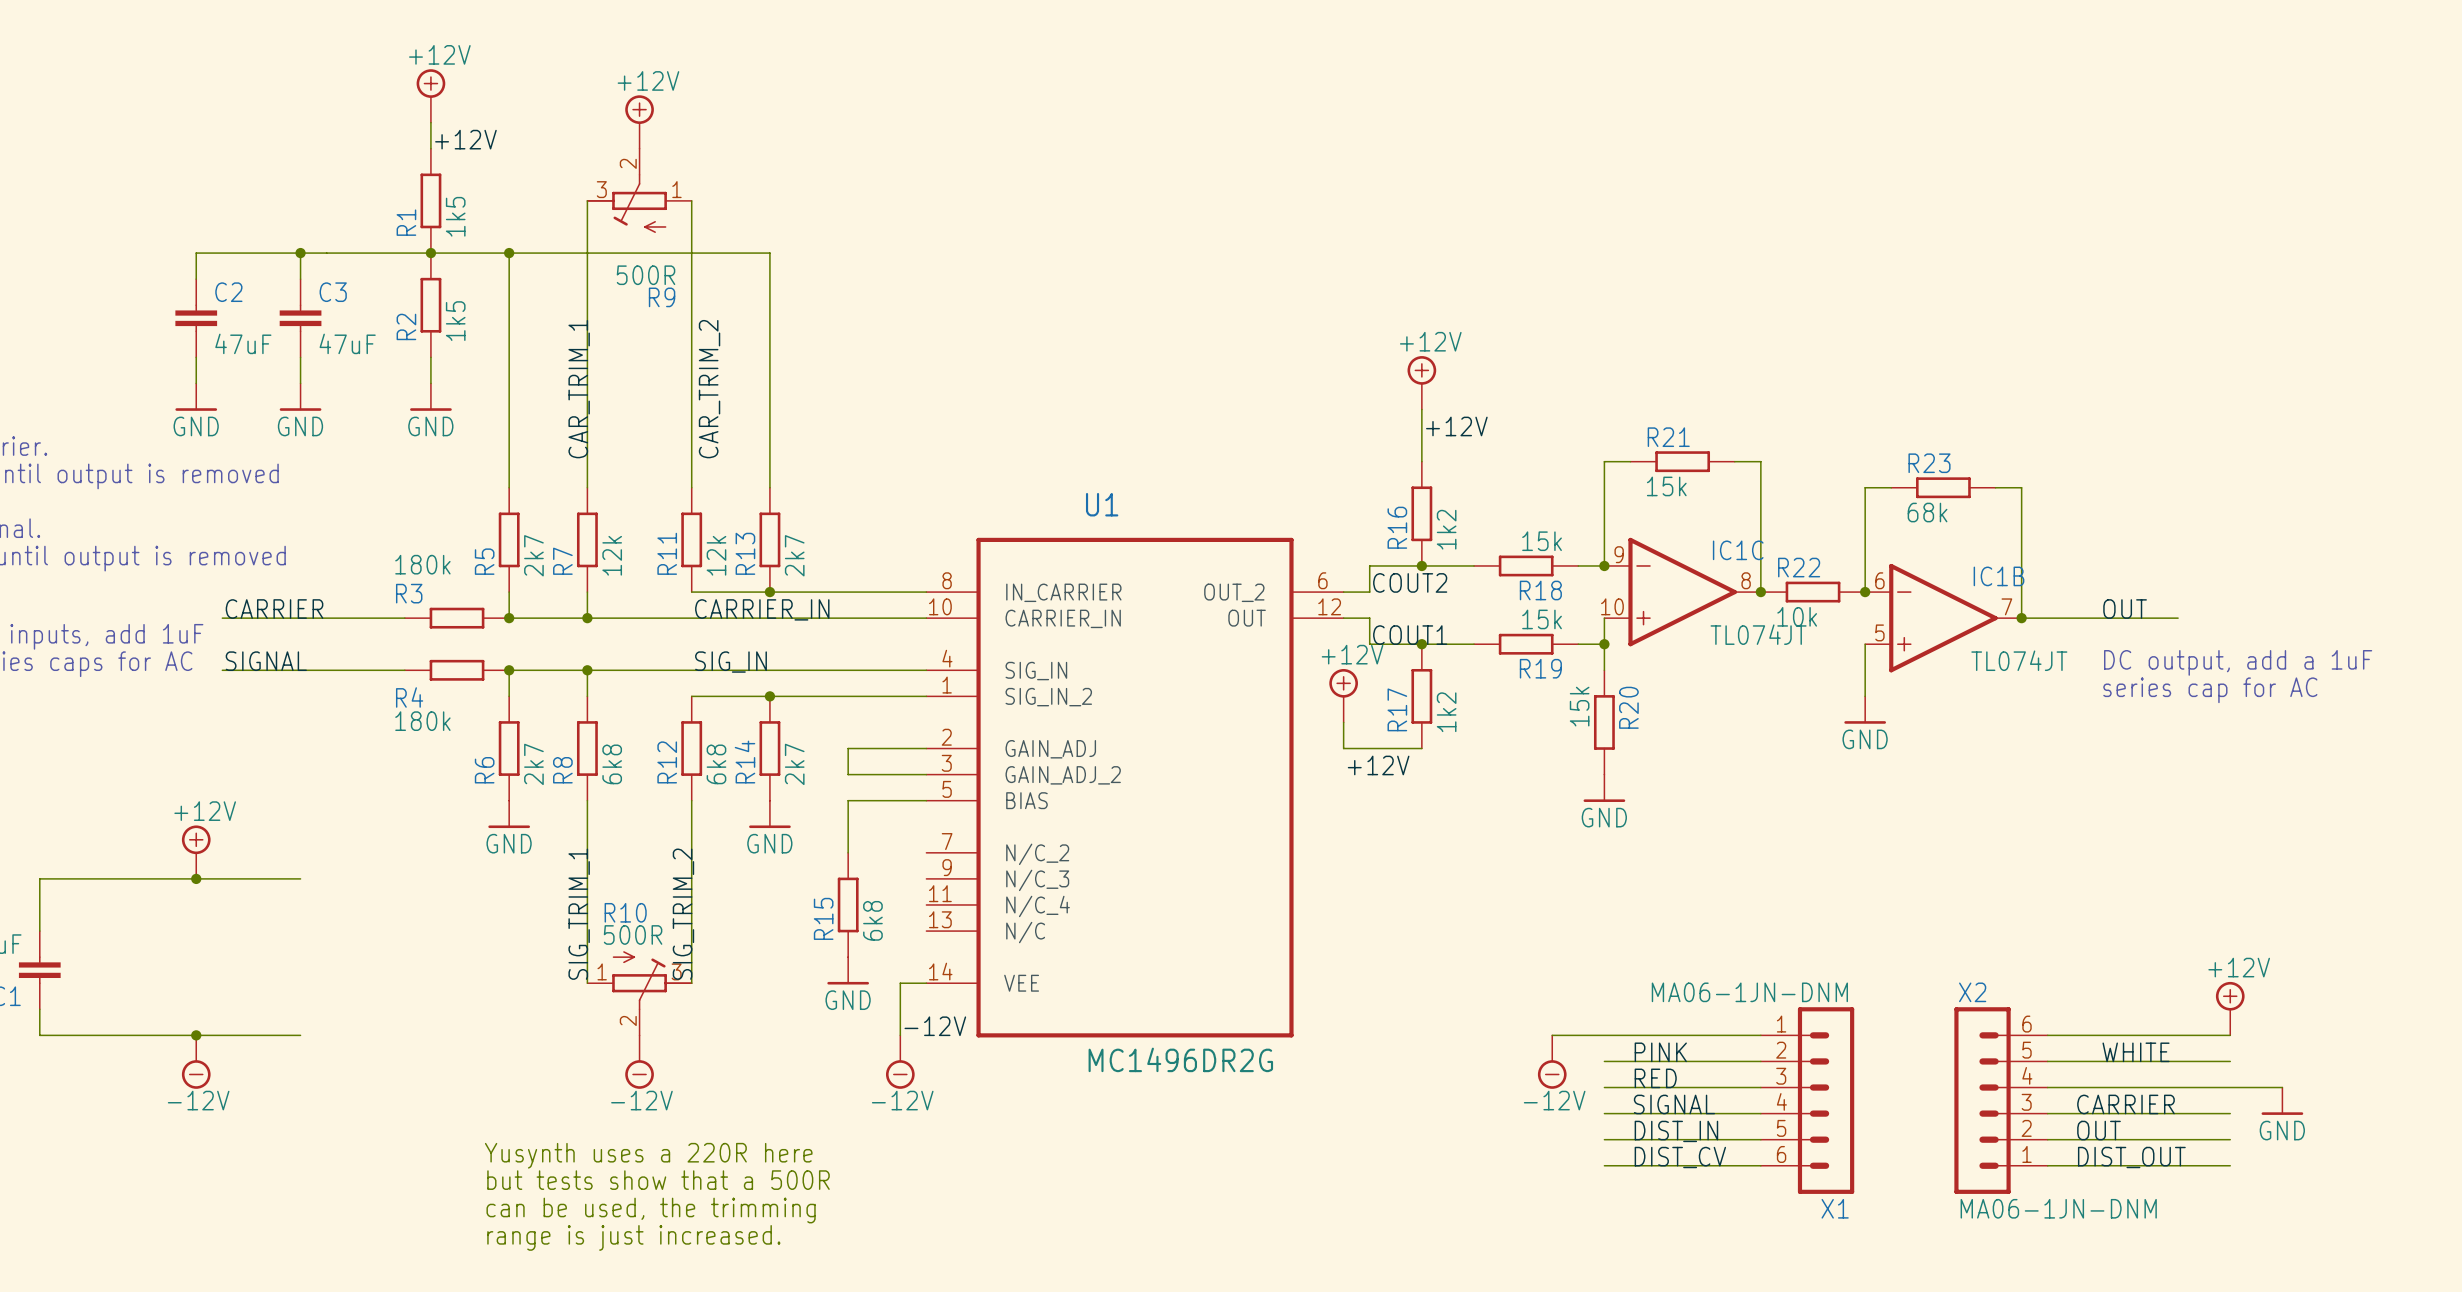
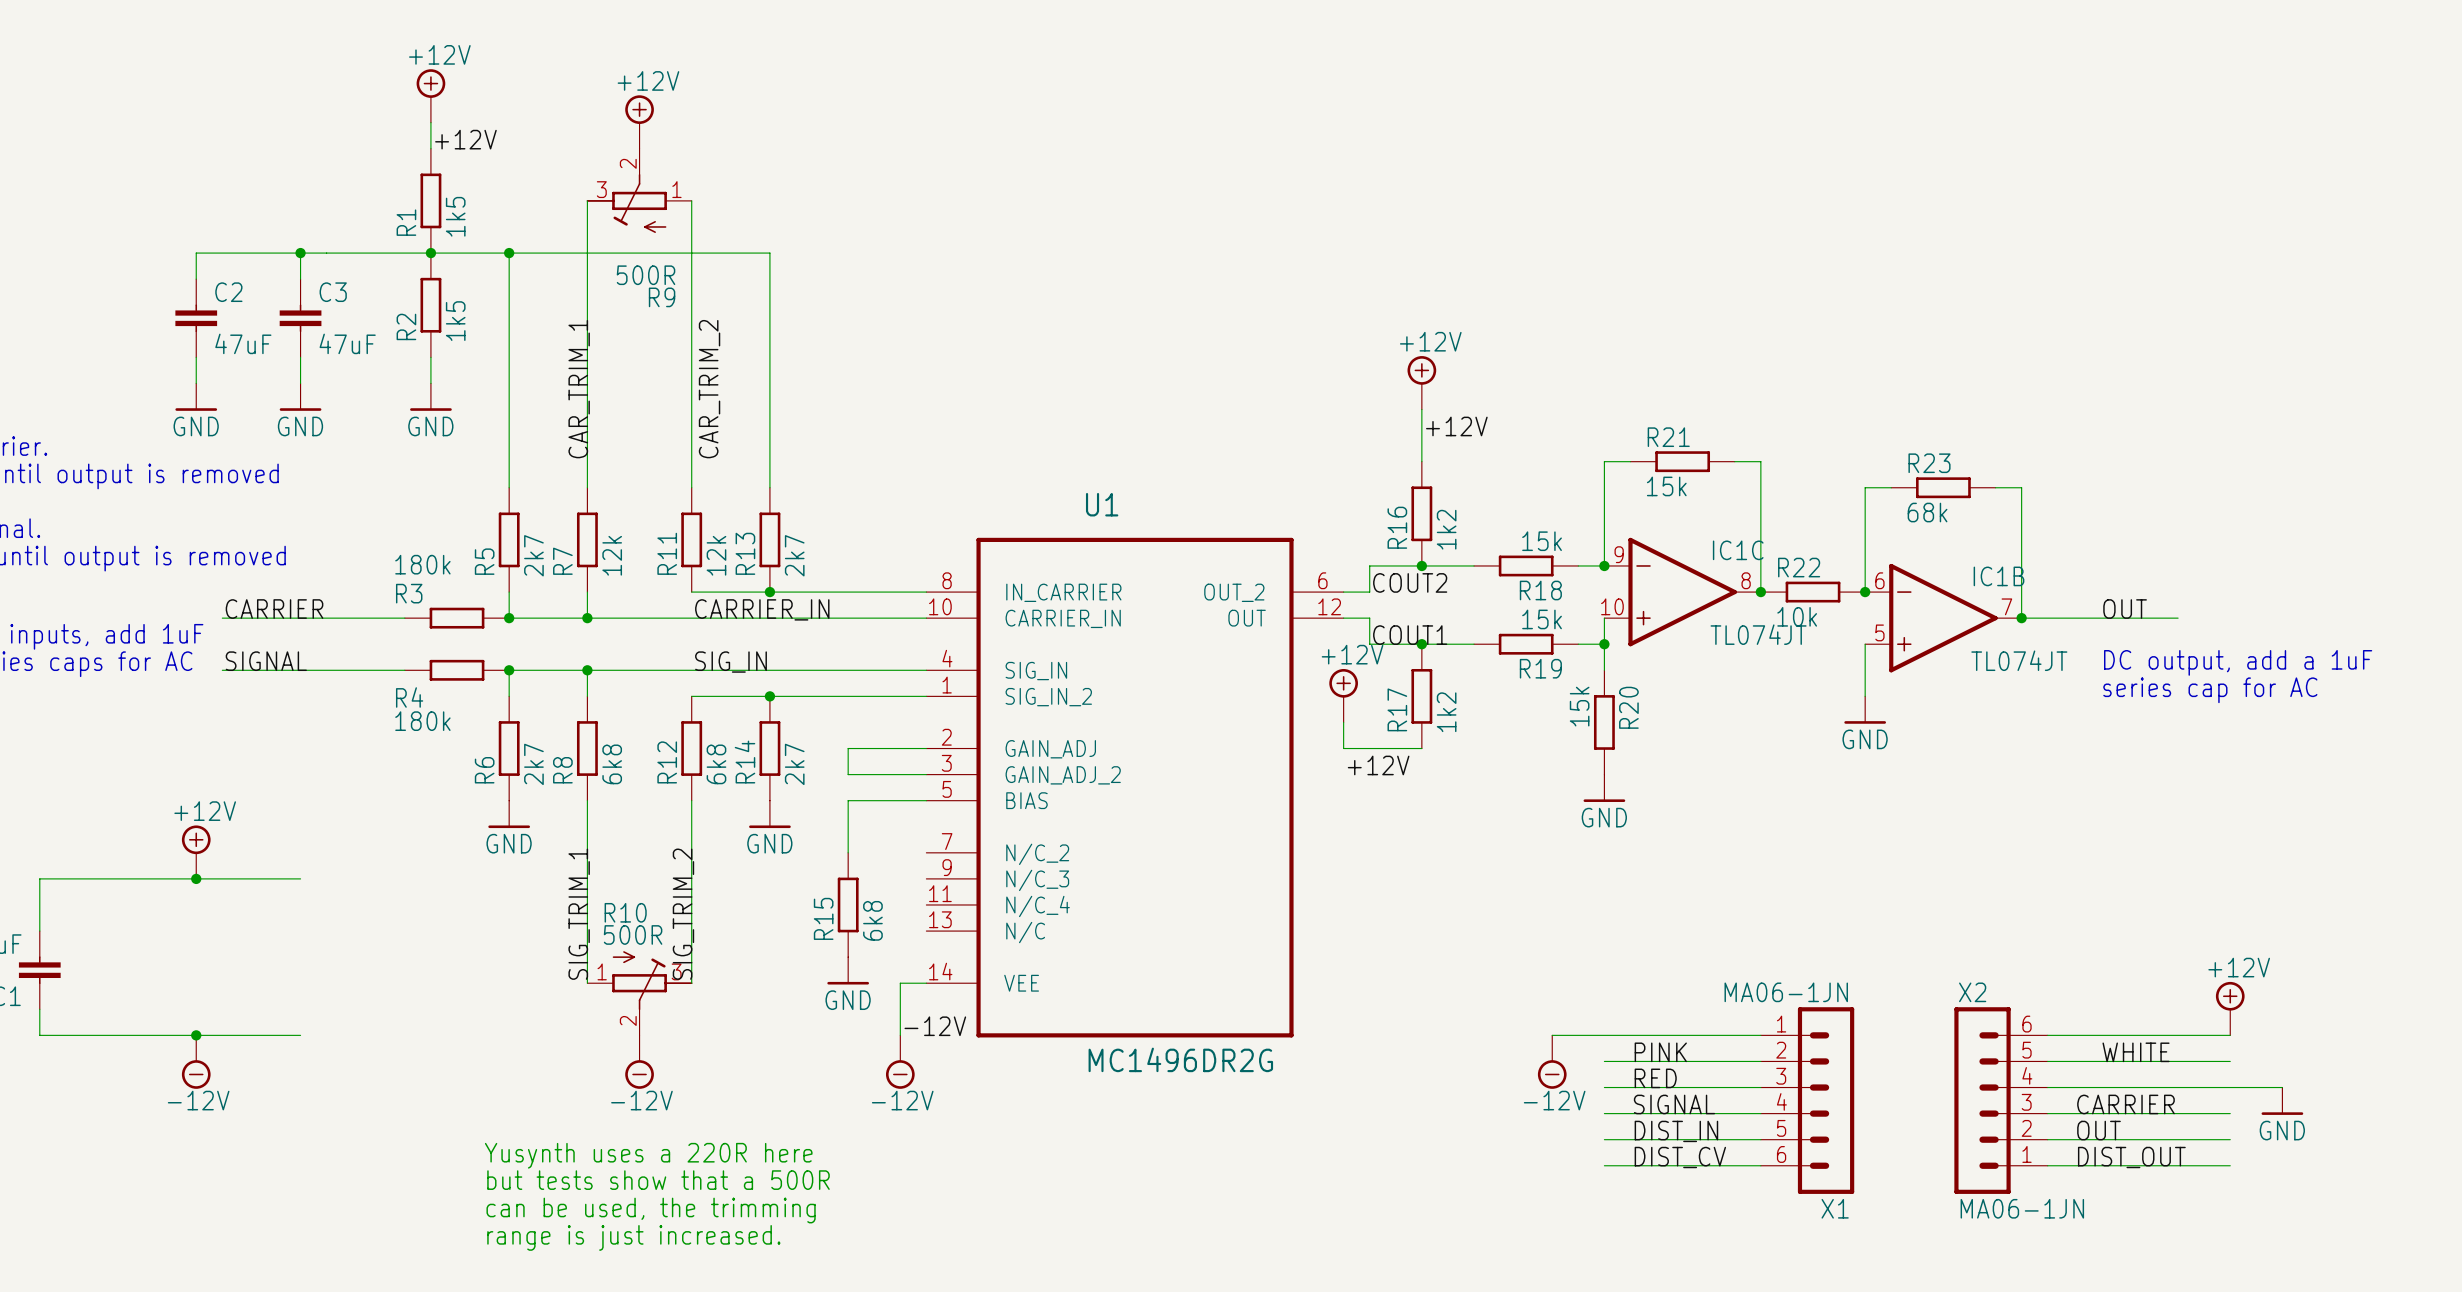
X1 value: MA06-1JN-DNM (1749, 992) -> MA06-1JN (1786, 992)
X2 value: MA06-1JN-DNM (2058, 1208) -> MA06-1JN (2022, 1208)

